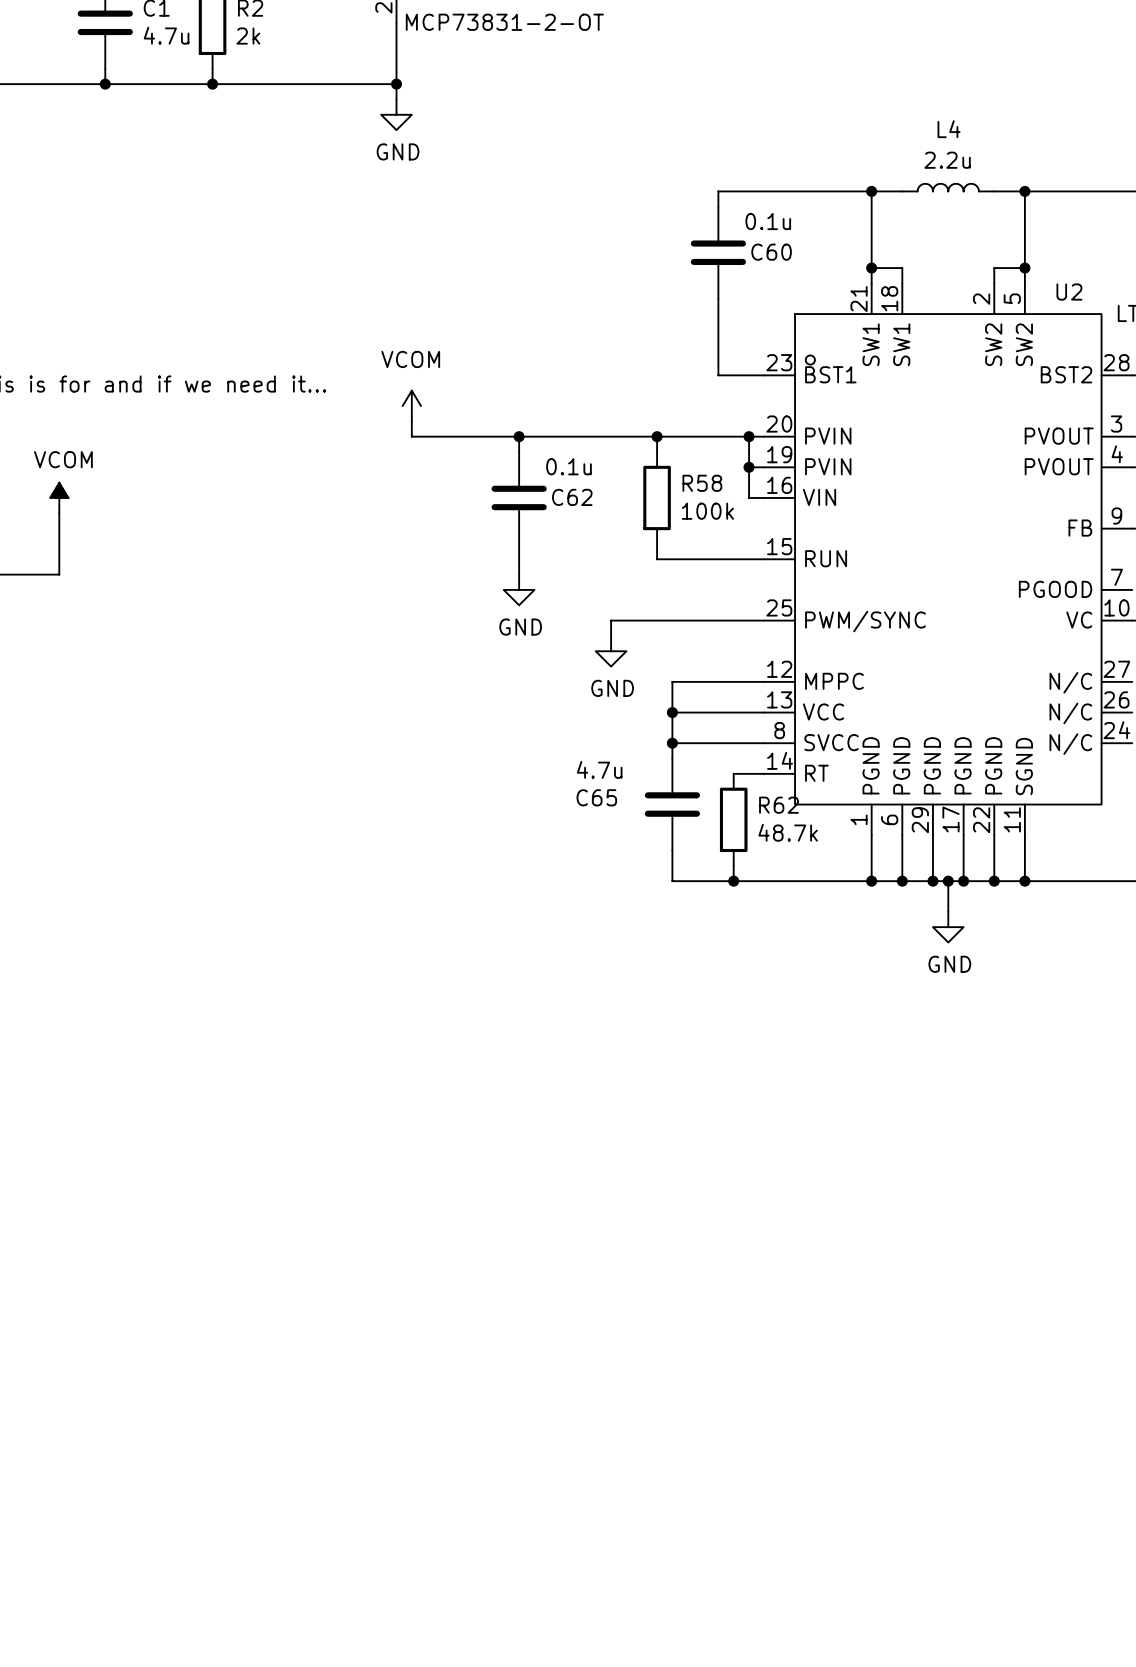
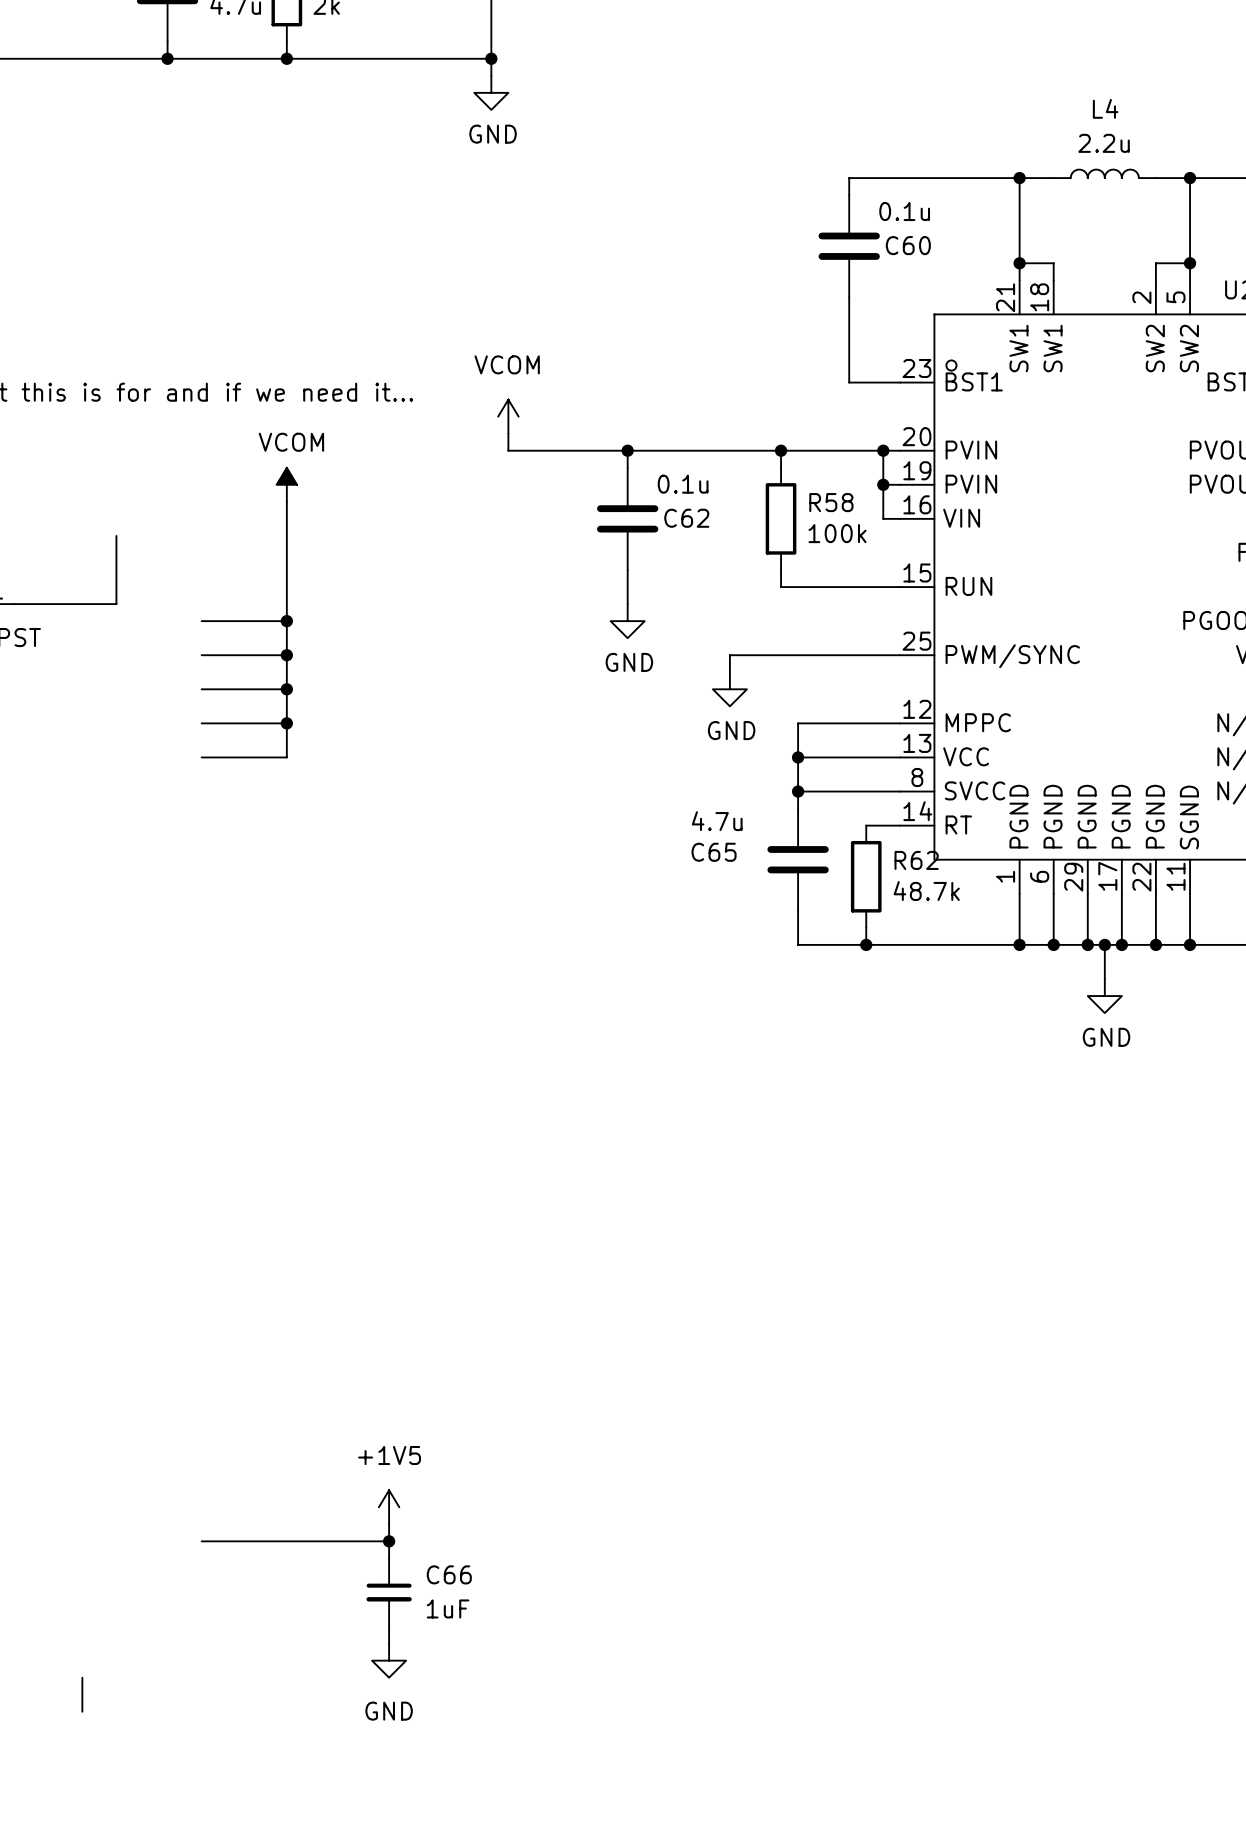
wire: none -> (286, 501) (286, 757) (201, 757)
power symbol position: VCOM (59, 497) -> VCOM (286, 484)
wire: none -> (201, 621) (286, 621)
junction: none -> (286, 621)
wire: none -> (201, 655) (286, 655)
junction: none -> (286, 655)
wire: none -> (201, 689) (286, 689)
junction: none -> (286, 689)
wire: none -> (201, 723) (286, 723)
junction: none -> (286, 723)
power symbol: none -> +1V5 (389, 1507)
wire: none -> (389, 1524) (389, 1558)
wire: none -> (201, 1541) (389, 1541)
junction: none -> (389, 1541)
C66: none -> 1uF (389, 1592)
wire: none -> (389, 1626) (389, 1643)
power symbol: none -> GND (389, 1660)
wire: none -> (82, 1677) (82, 1711)

